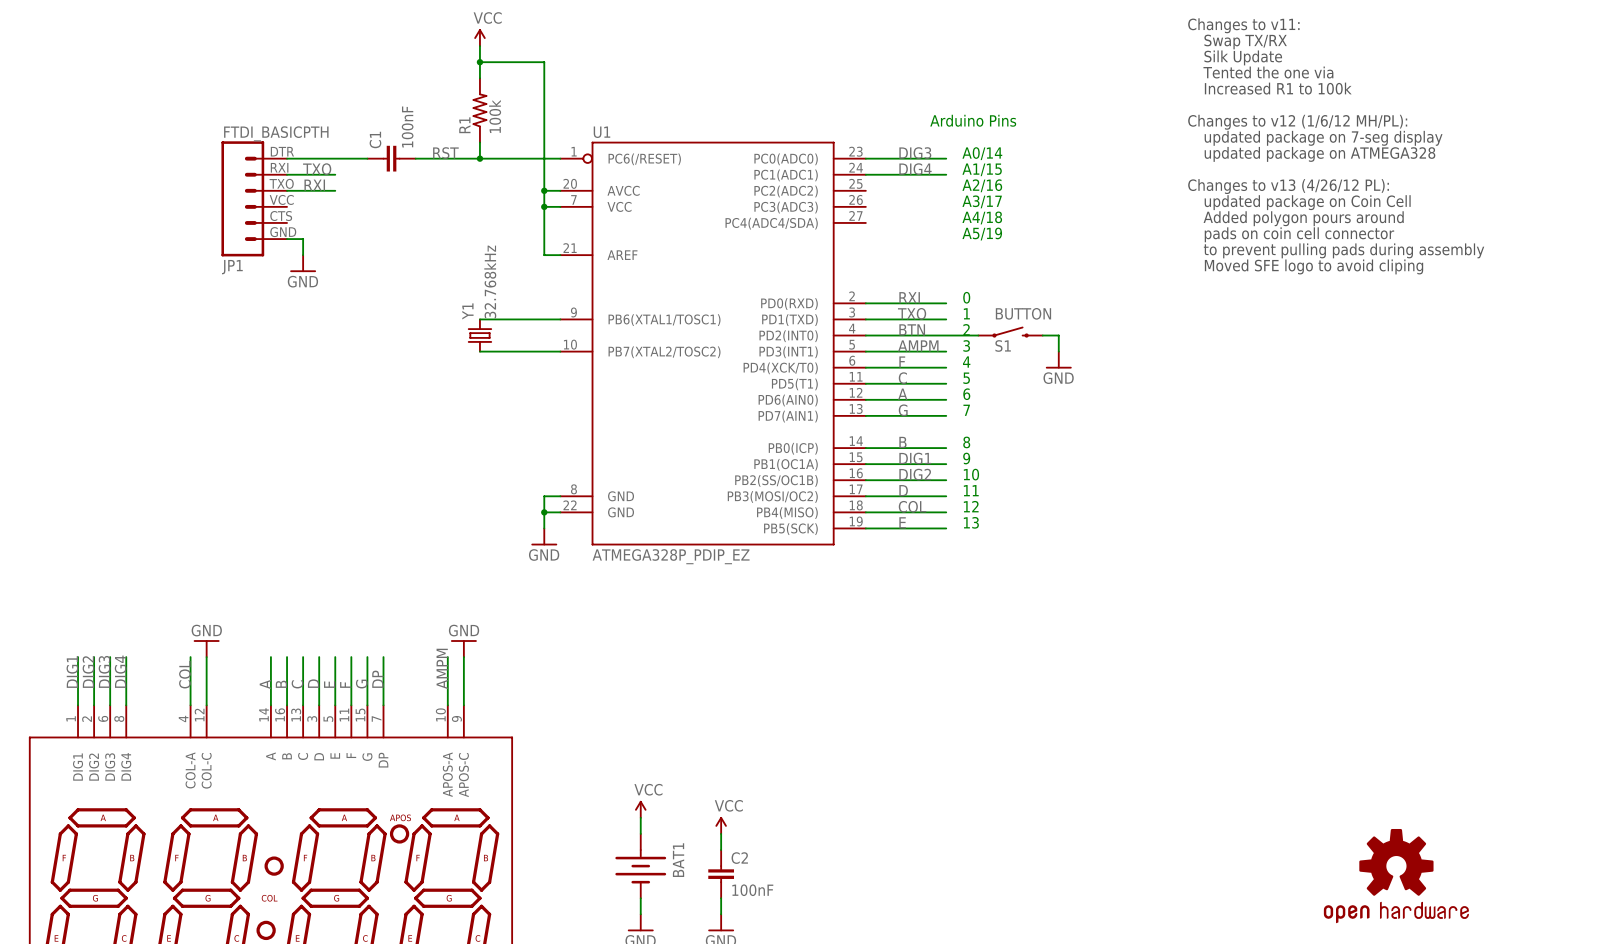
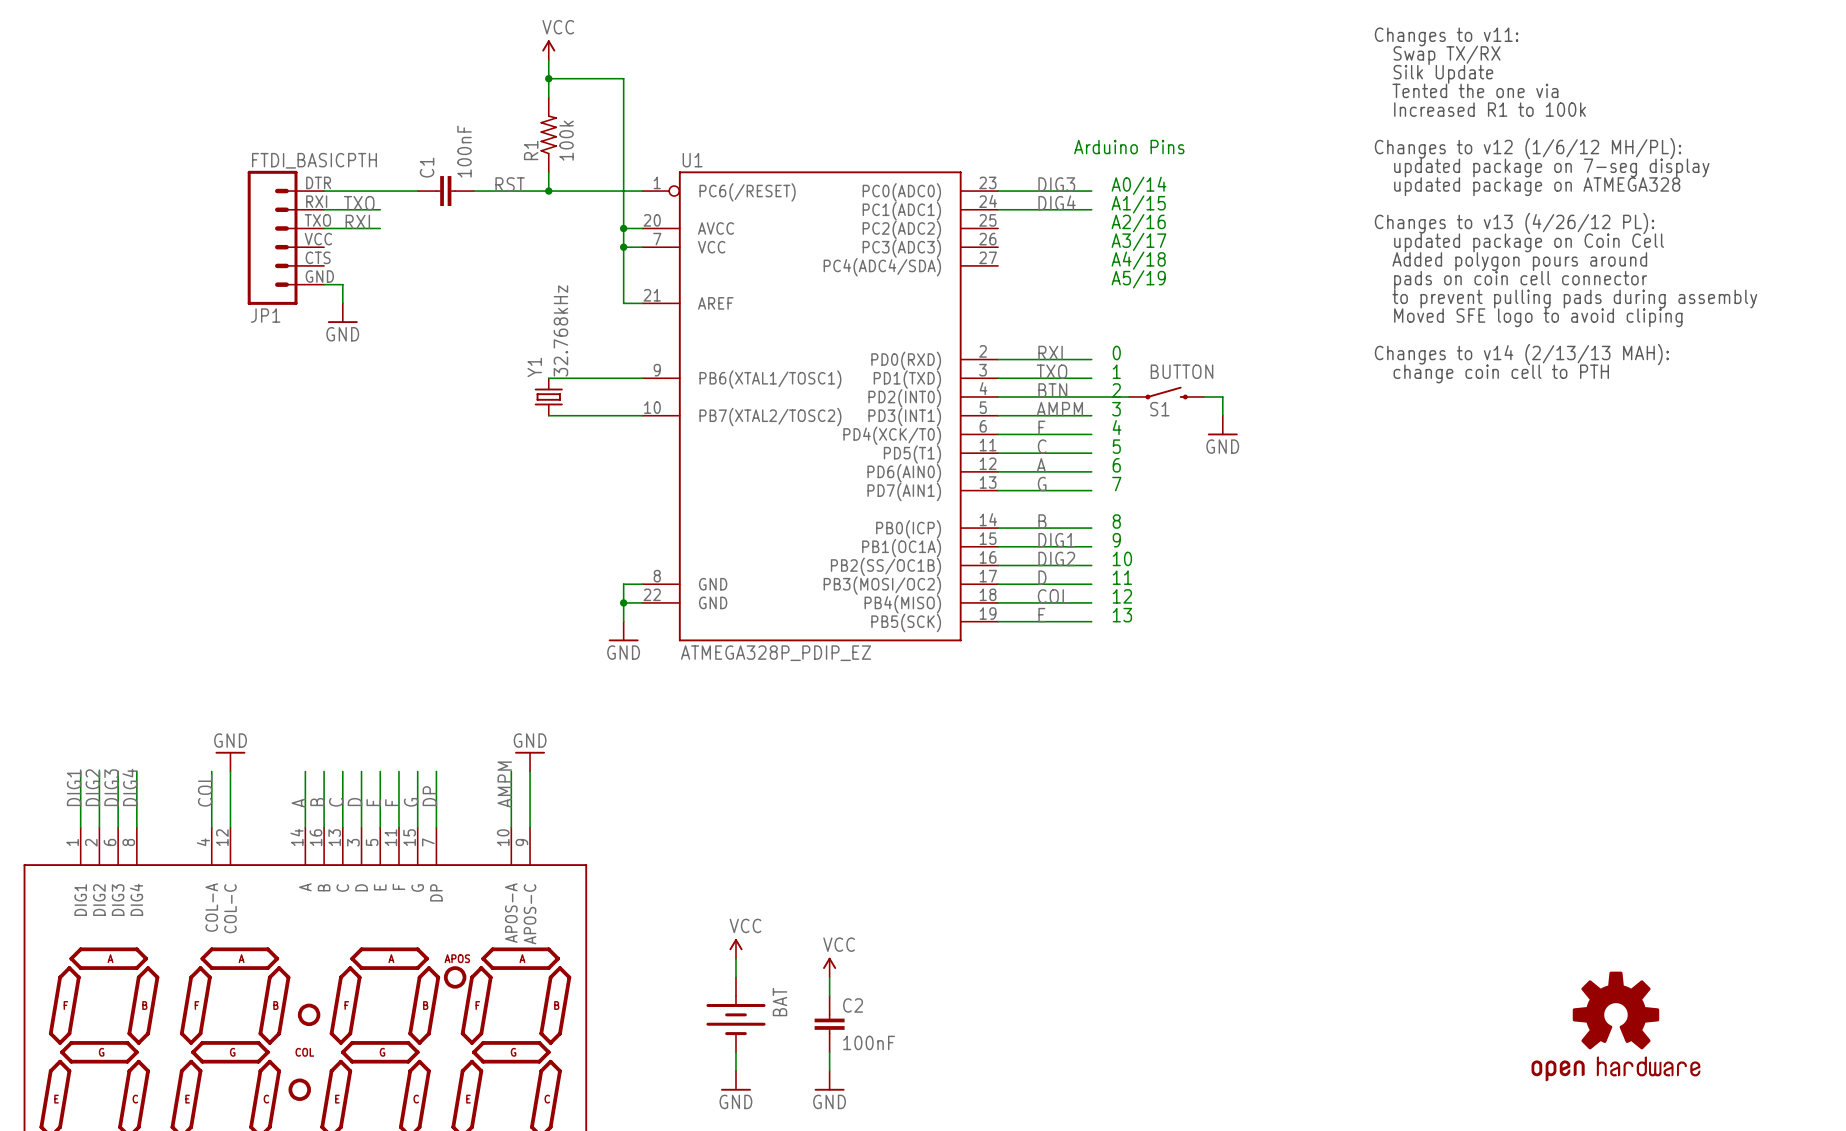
text: none -> Changes to v14 (2/13/13 MAH): (1521, 354)
text: none -> change coin cell to PTH (1501, 373)
BAT1 name: BAT1 (678, 860) -> BAT (779, 1002)

